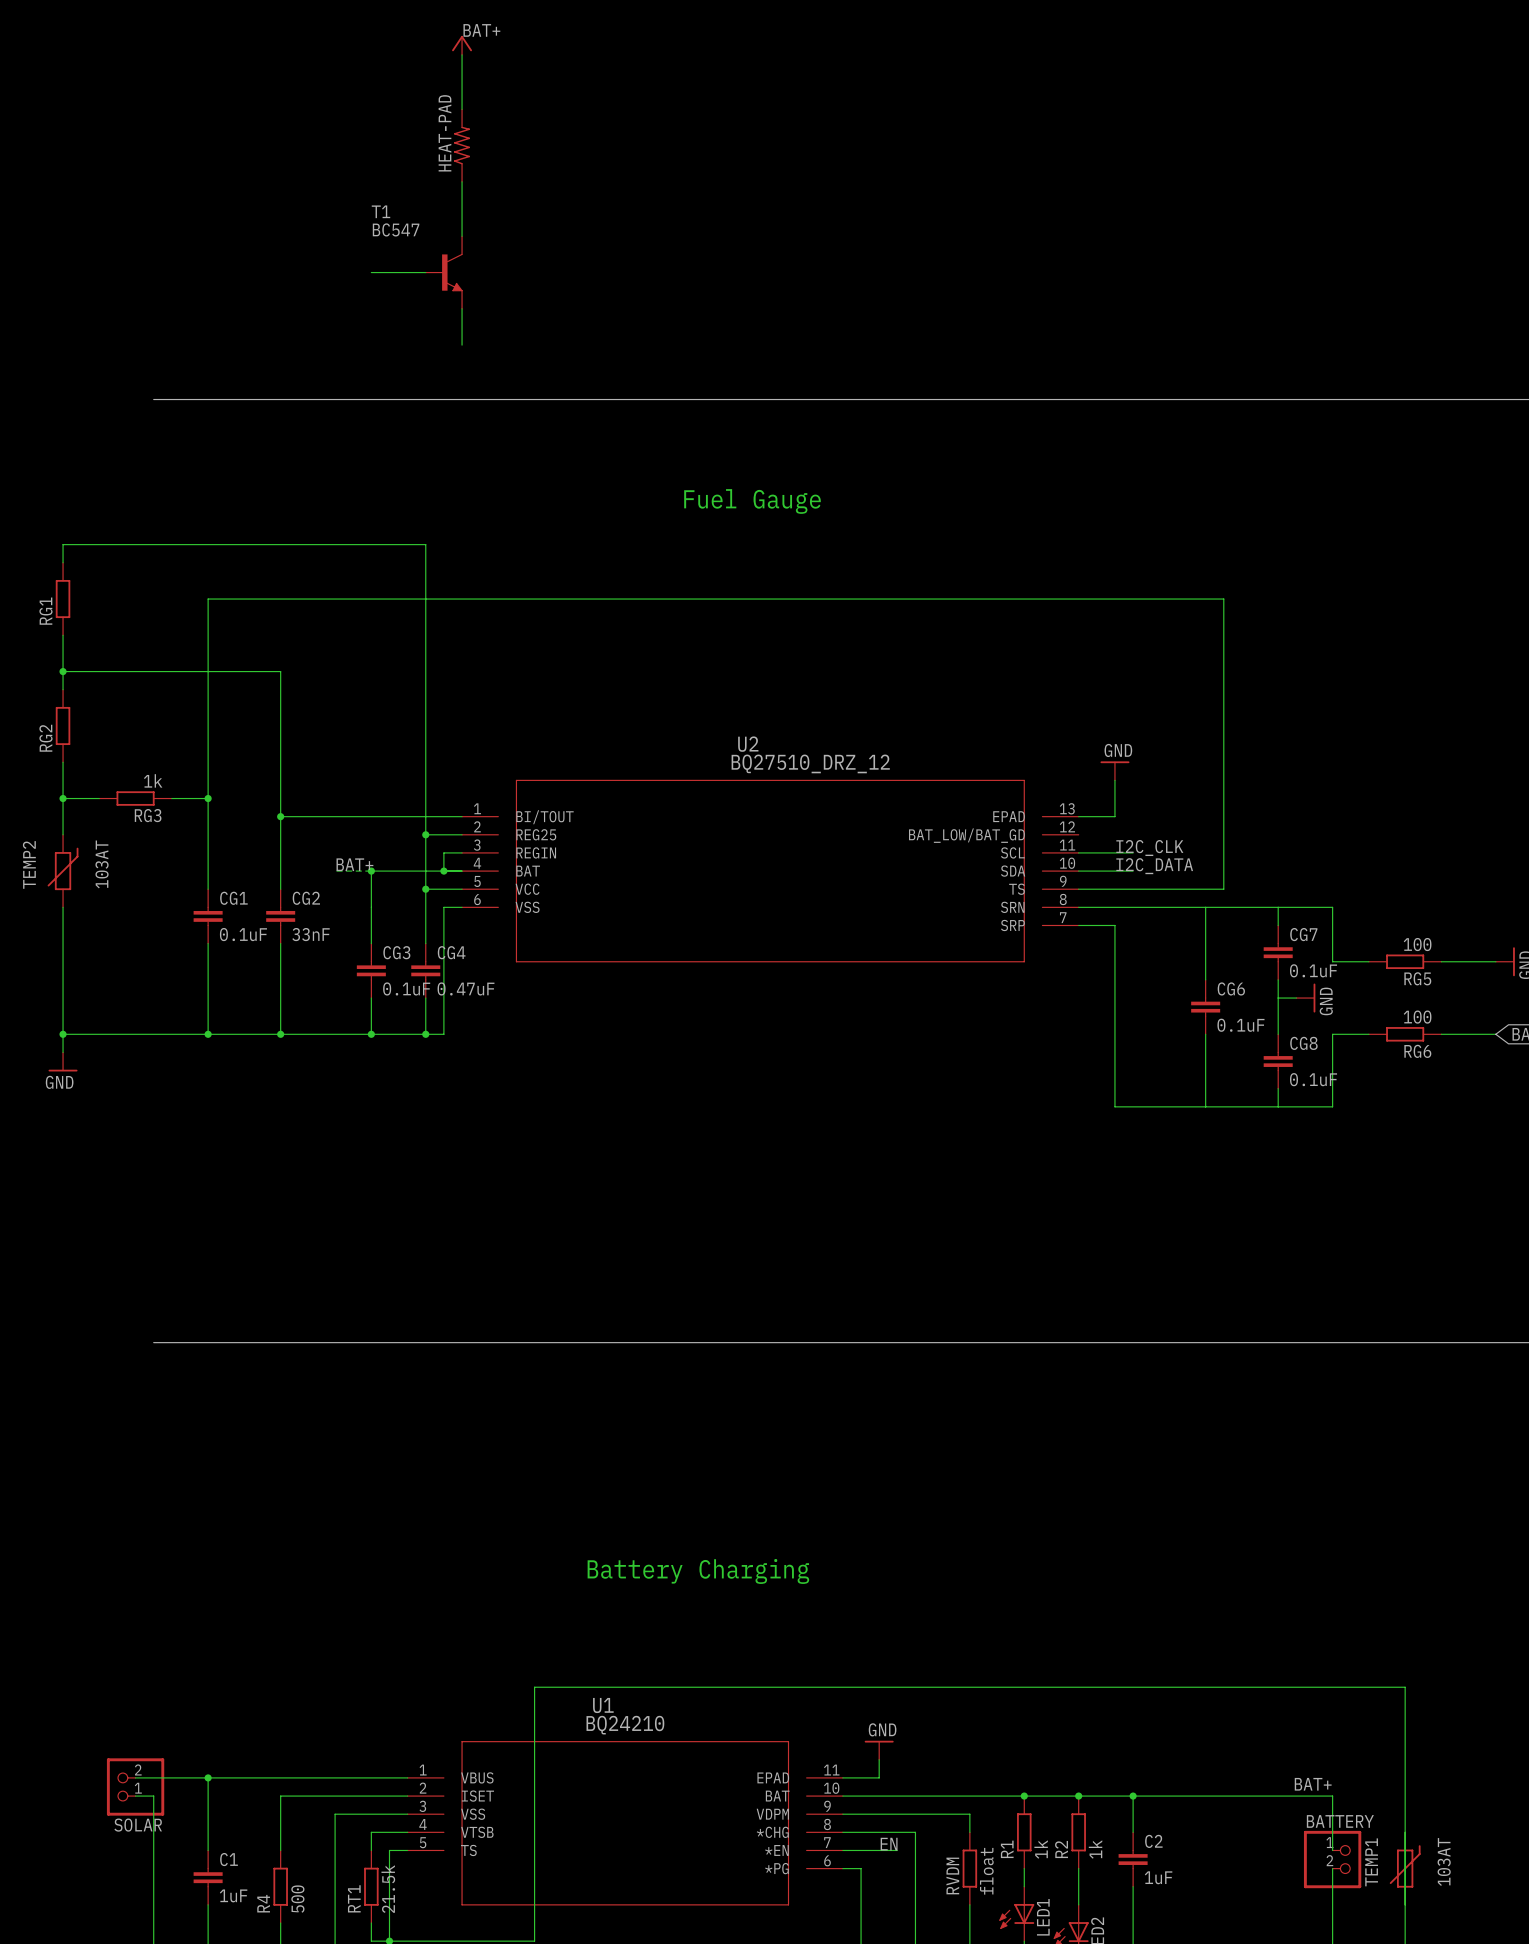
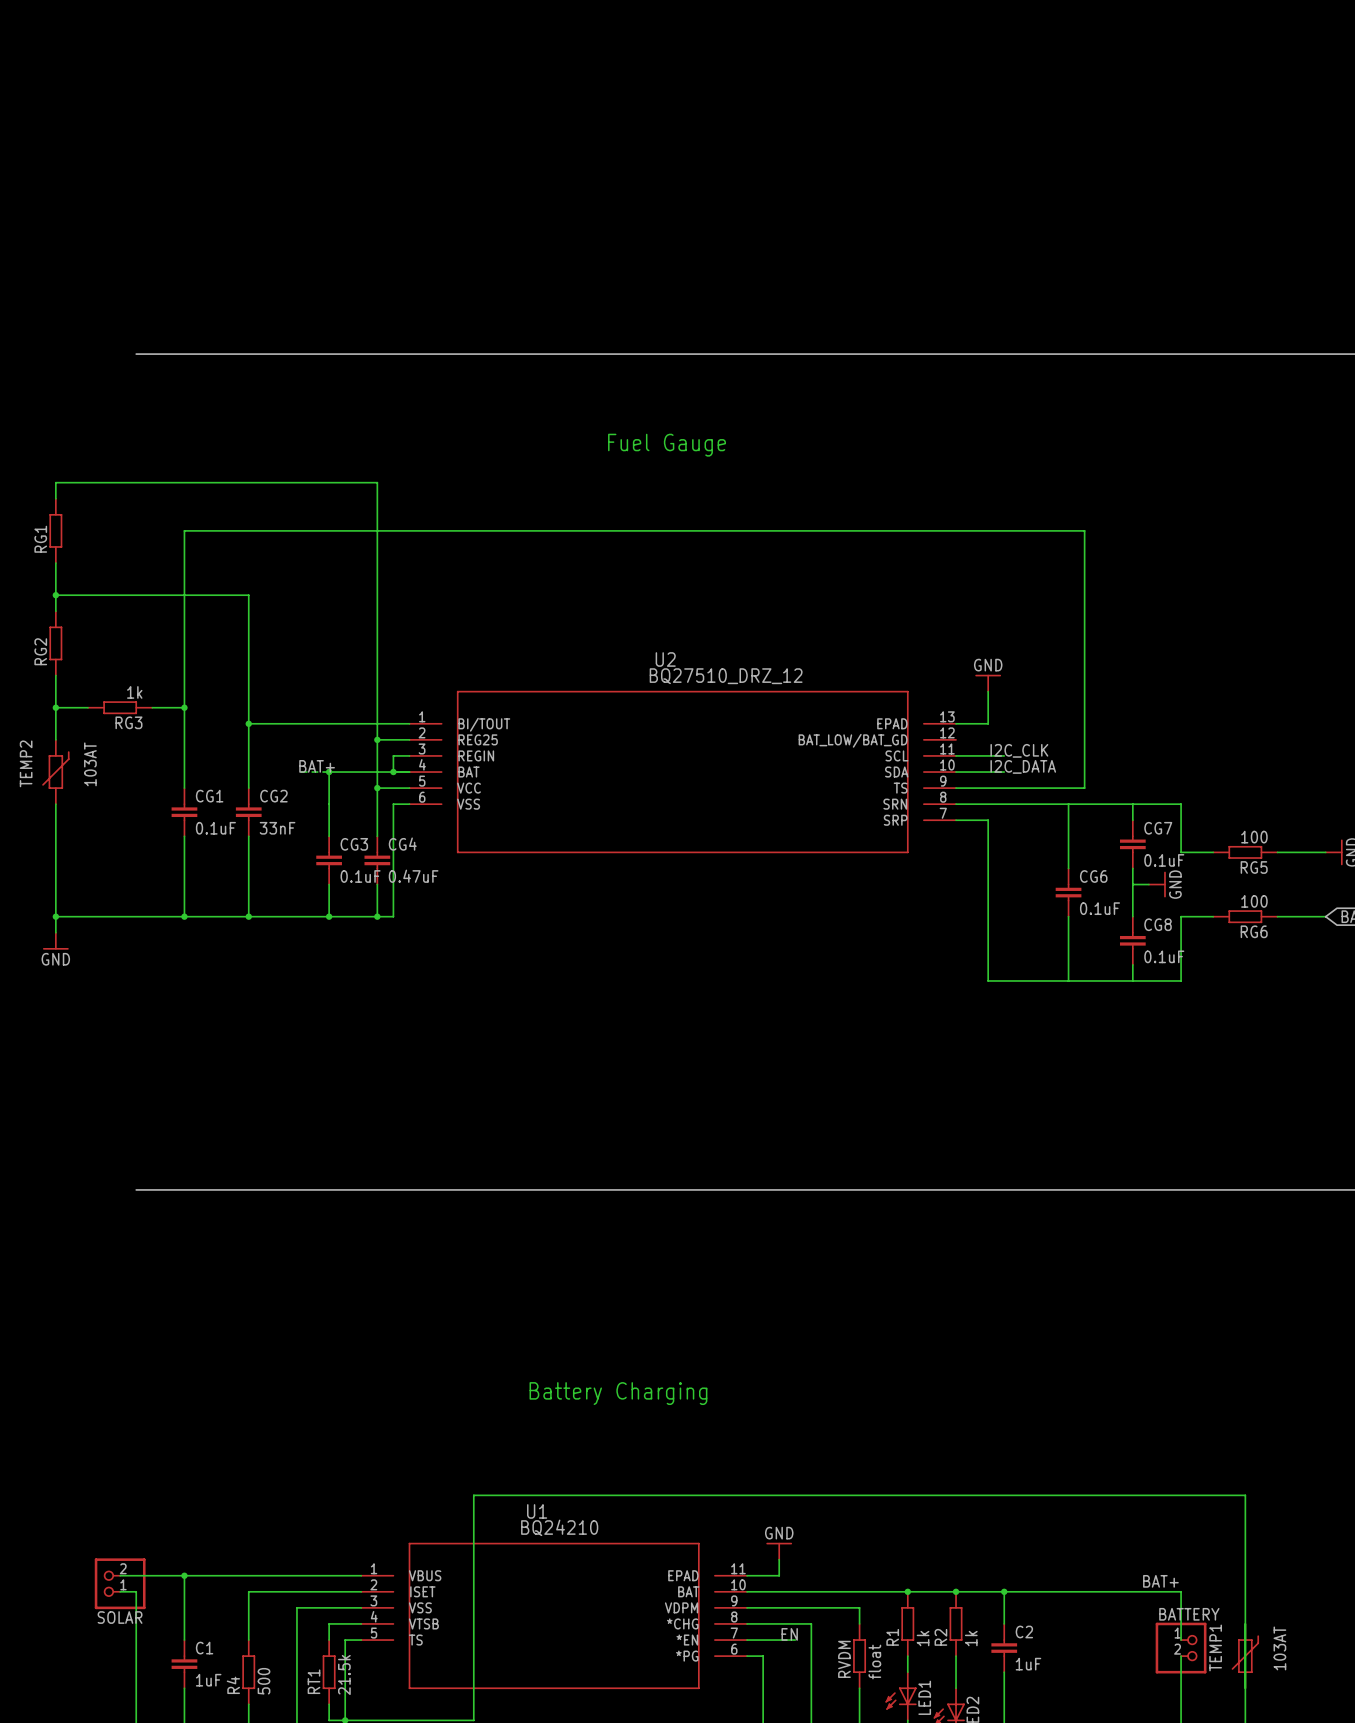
power symbol: BAT+ (462, 45) -> none
wire: (462, 54) (462, 109) -> none
HEAT-PAD: (462, 145) -> none
wire: (462, 181) (462, 236) -> none
wire: (371, 272) (425, 272) -> none
T1: BC547 (444, 272) -> none
wire: (462, 308) (462, 345) -> none

